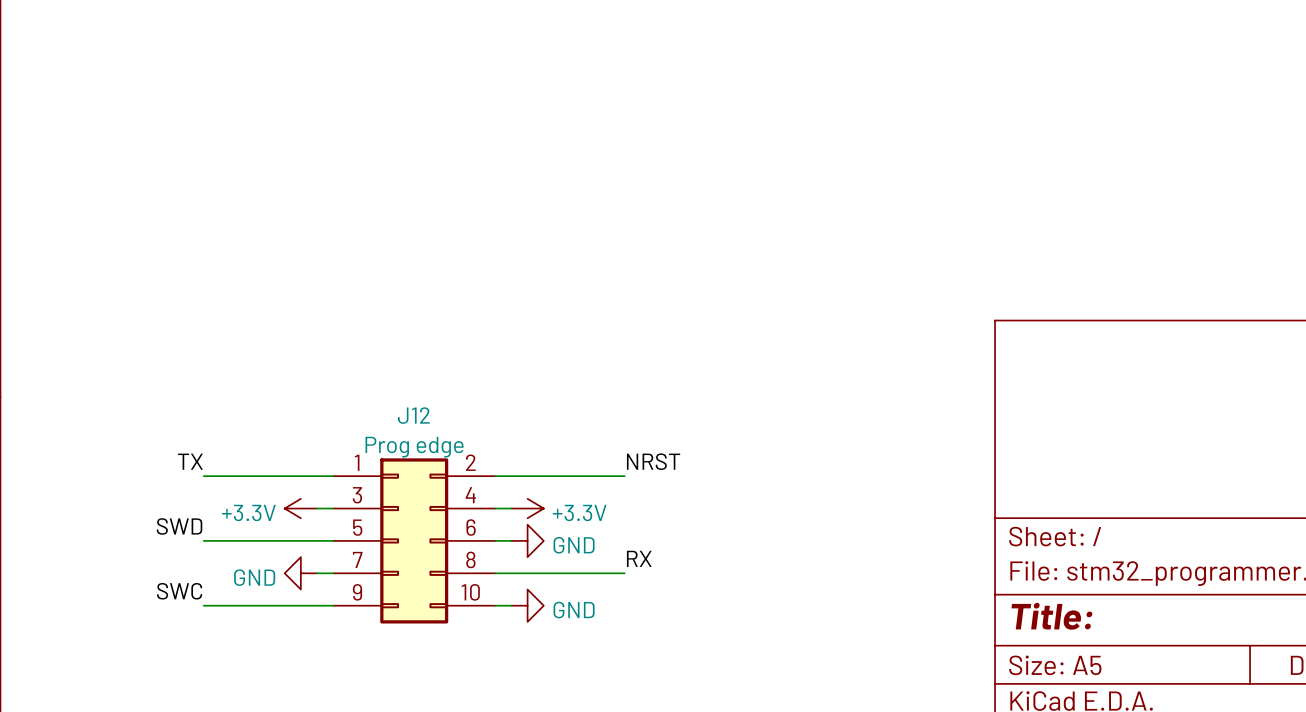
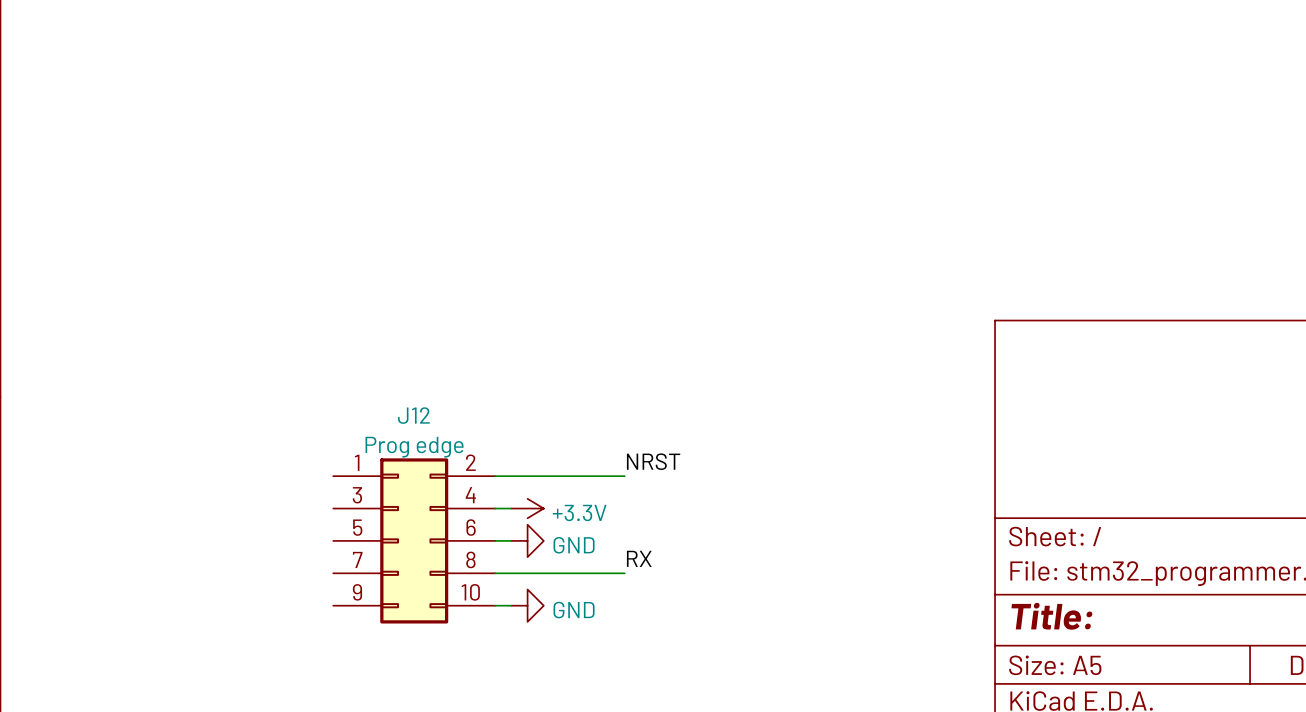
label: TX (190, 461) -> none
wire: (203, 476) (333, 476) -> none
power symbol: +3.3V (300, 508) -> none
wire: (317, 508) (333, 508) -> none
label: SWD (179, 526) -> none
wire: (203, 540) (333, 540) -> none
power symbol: GND (300, 573) -> none
wire: (317, 573) (333, 573) -> none
label: SWC (179, 591) -> none
wire: (203, 605) (333, 605) -> none

